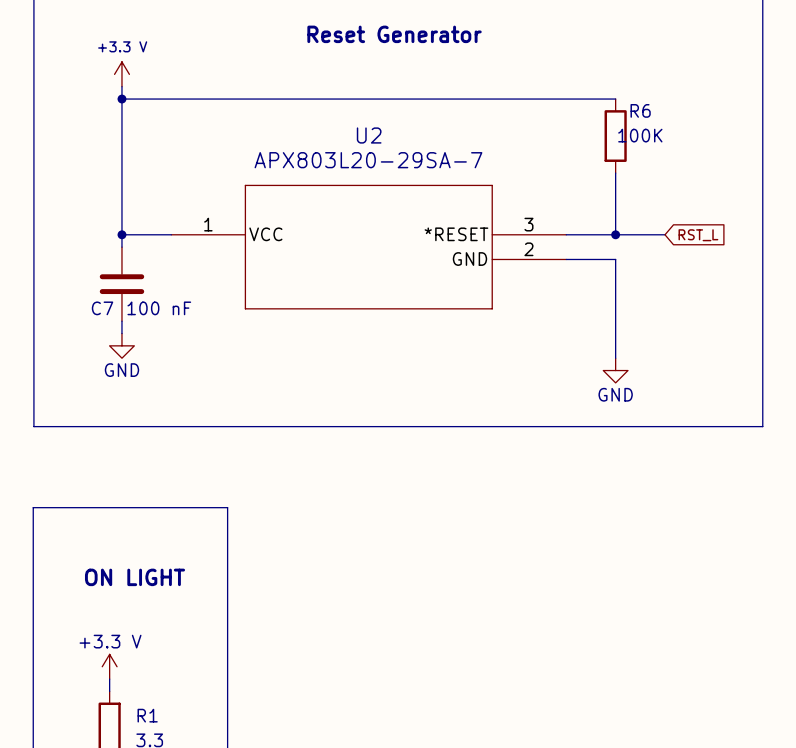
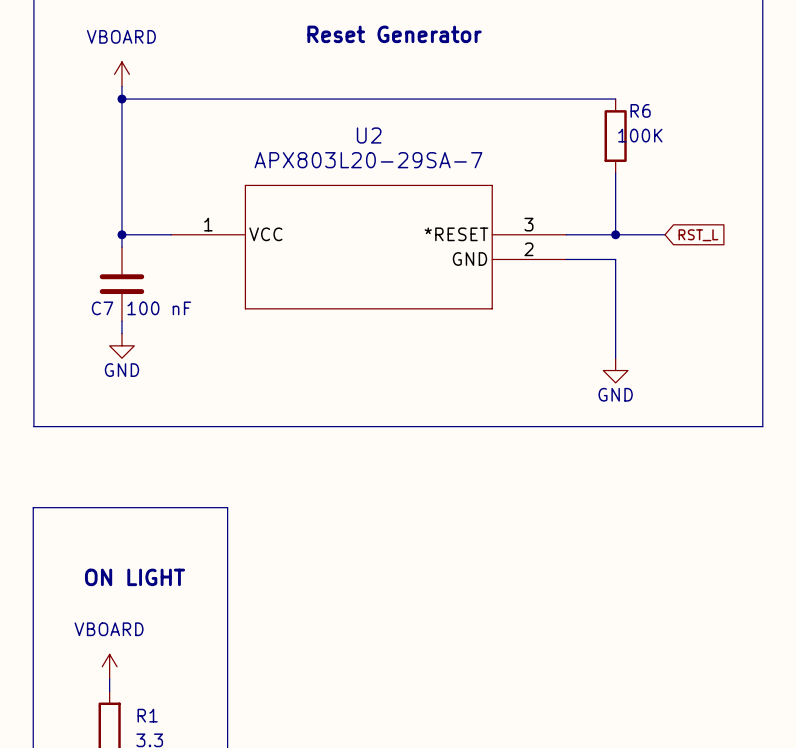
power symbol: +3.3 V (121, 74) -> VBOARD (121, 74)
power symbol: +3.3 V (109, 666) -> VBOARD (109, 666)

